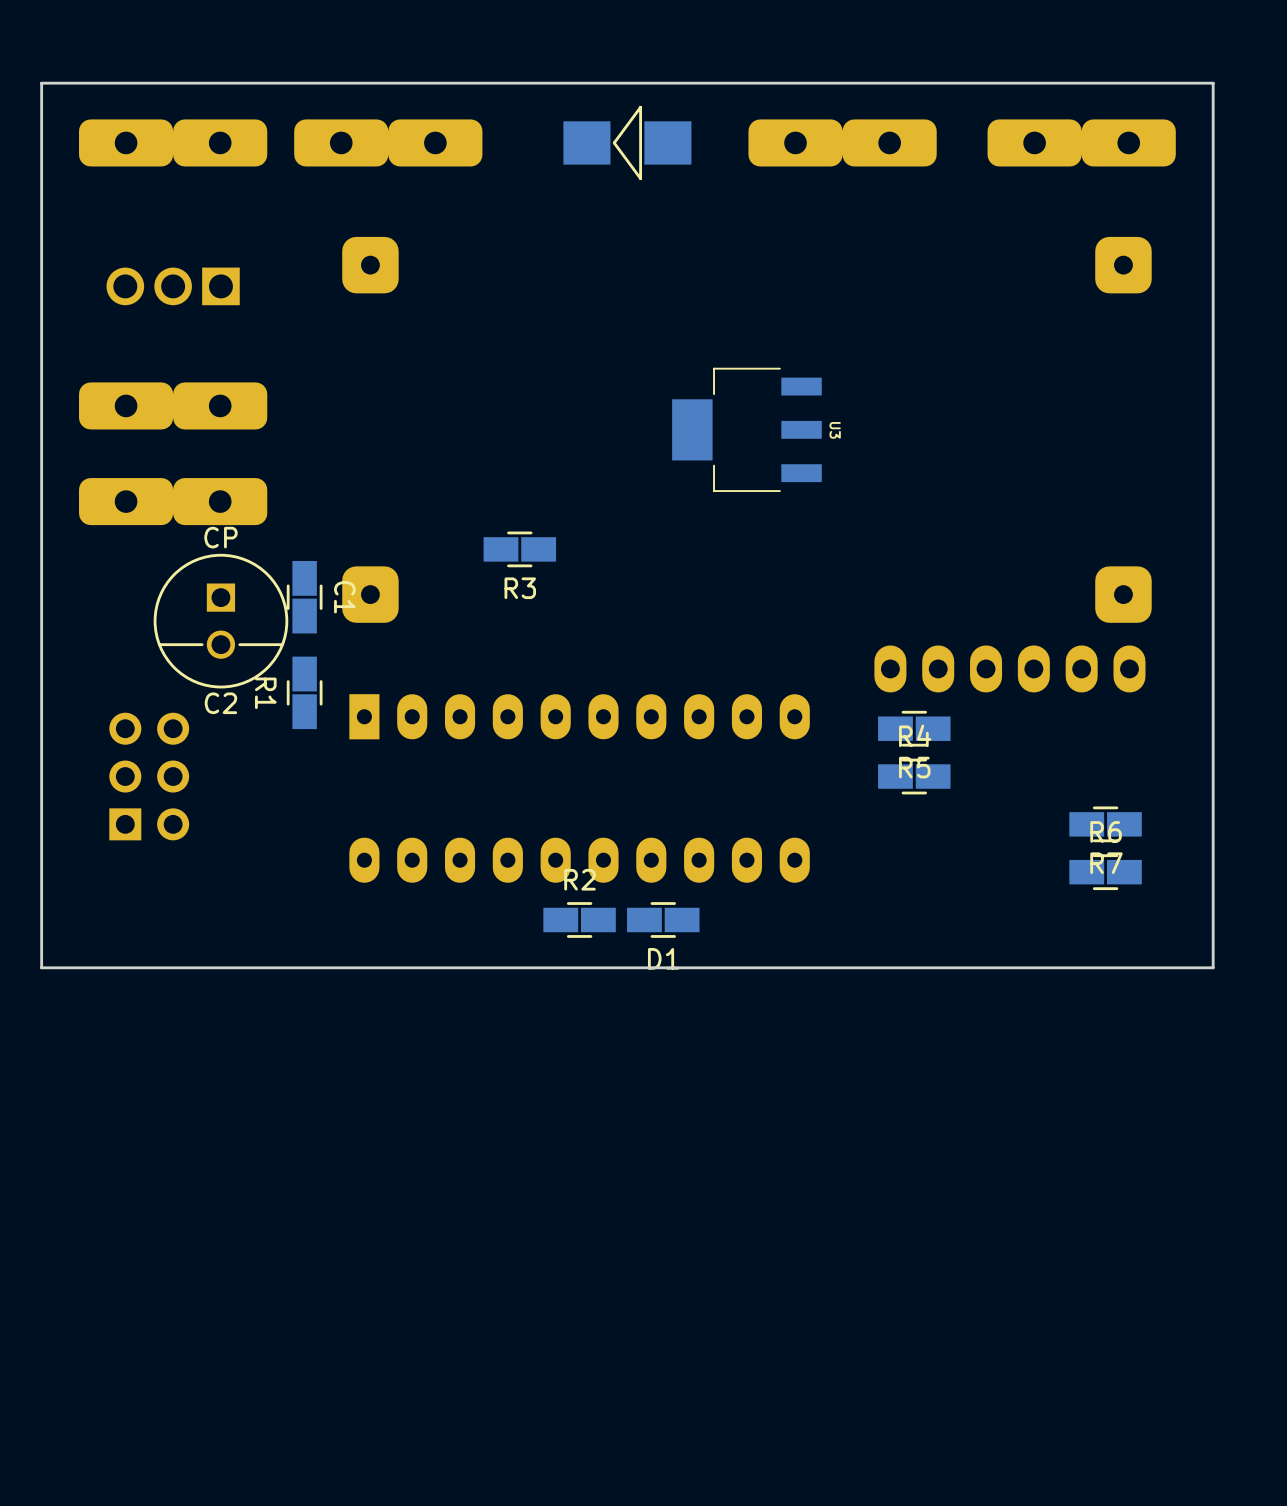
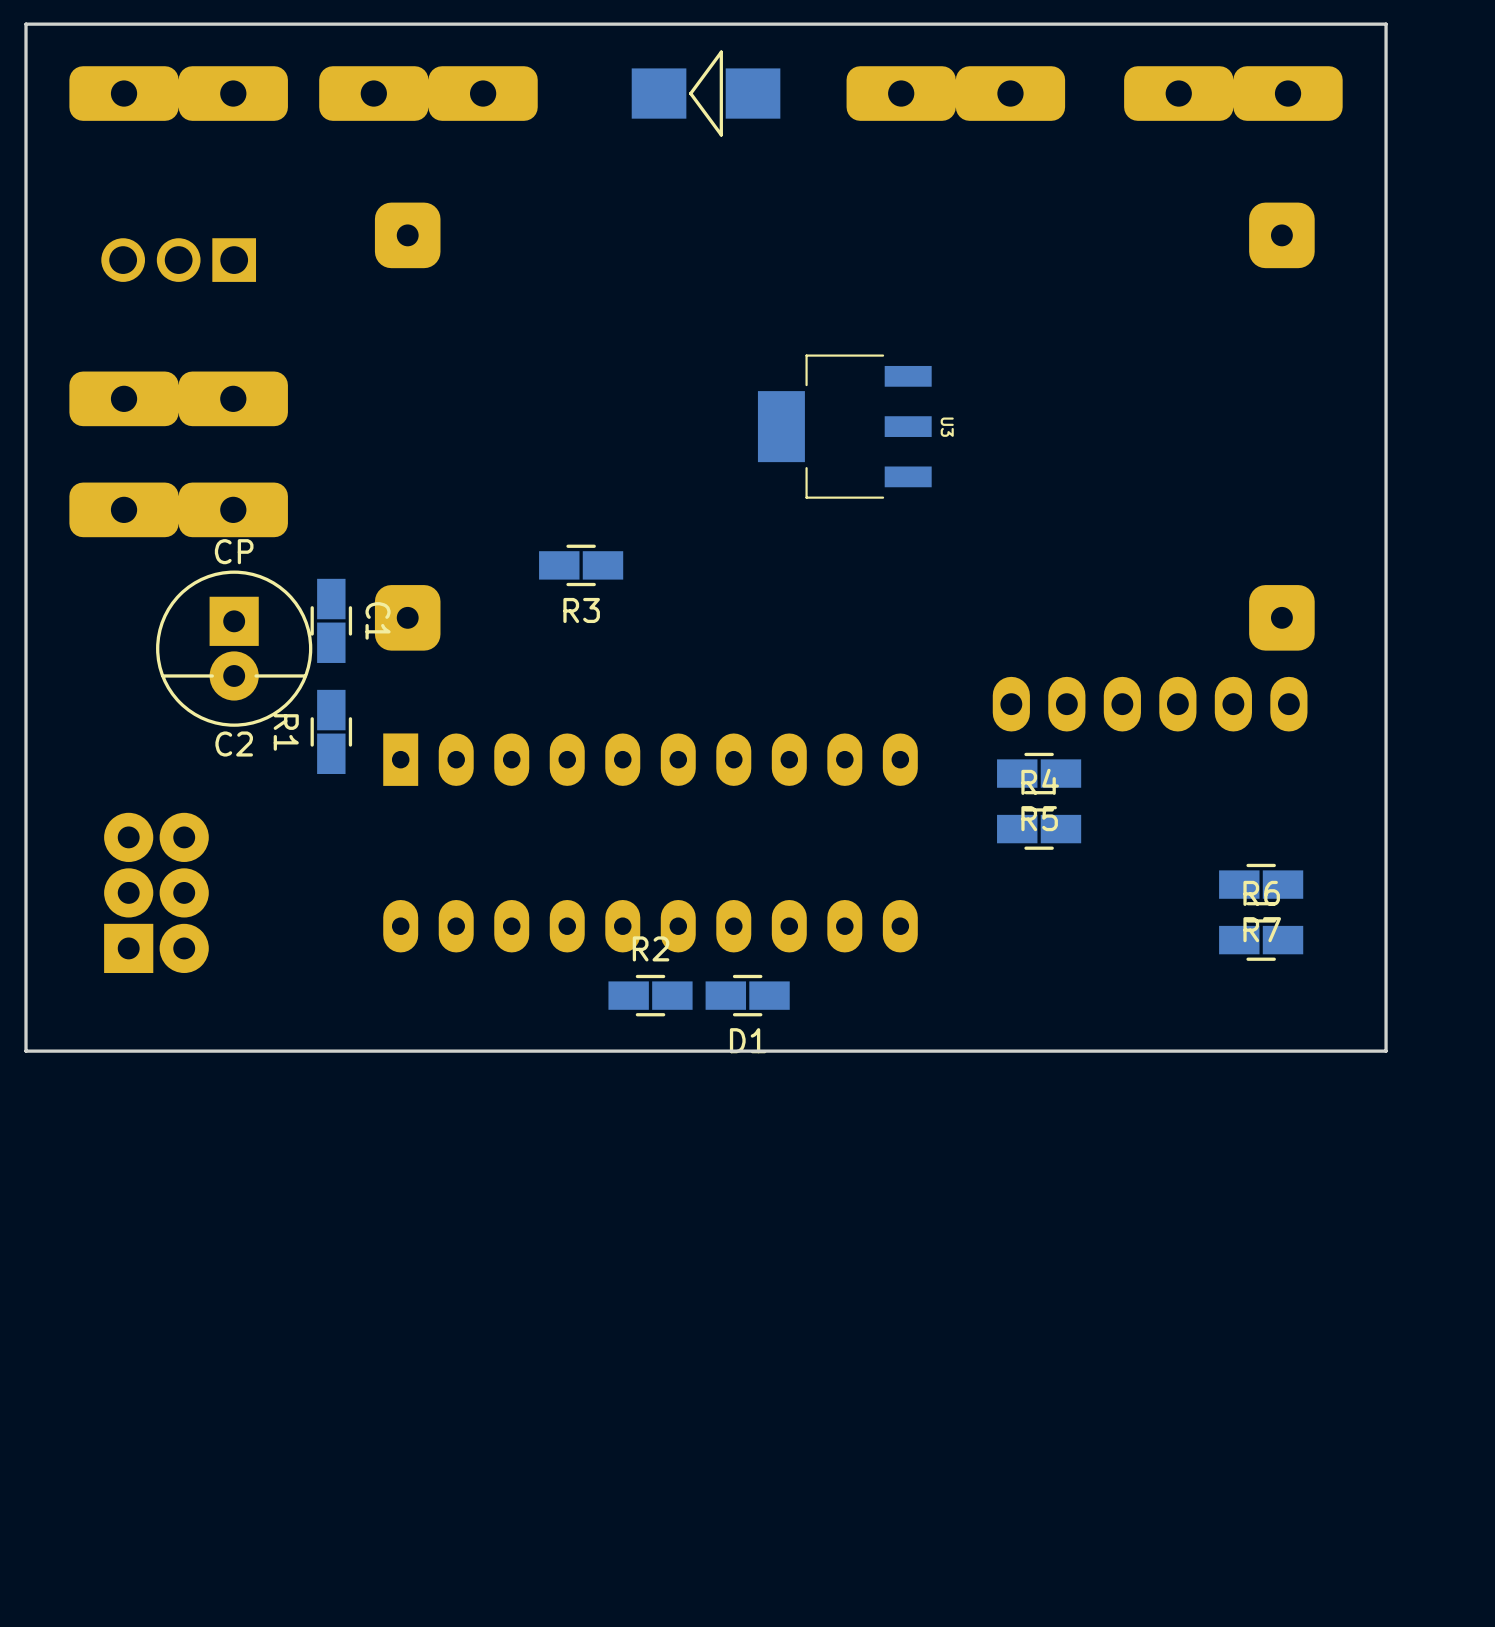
C2 footprint: [153, 553, 289, 689] -> [156, 570, 313, 727]
part: (149, 776) -> none
part: none -> (156, 892)

